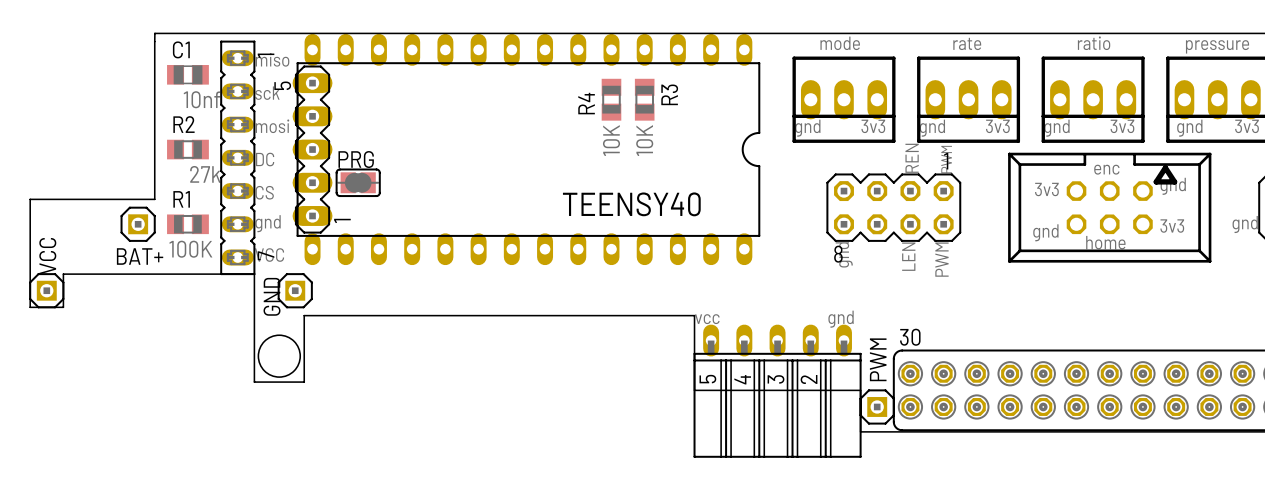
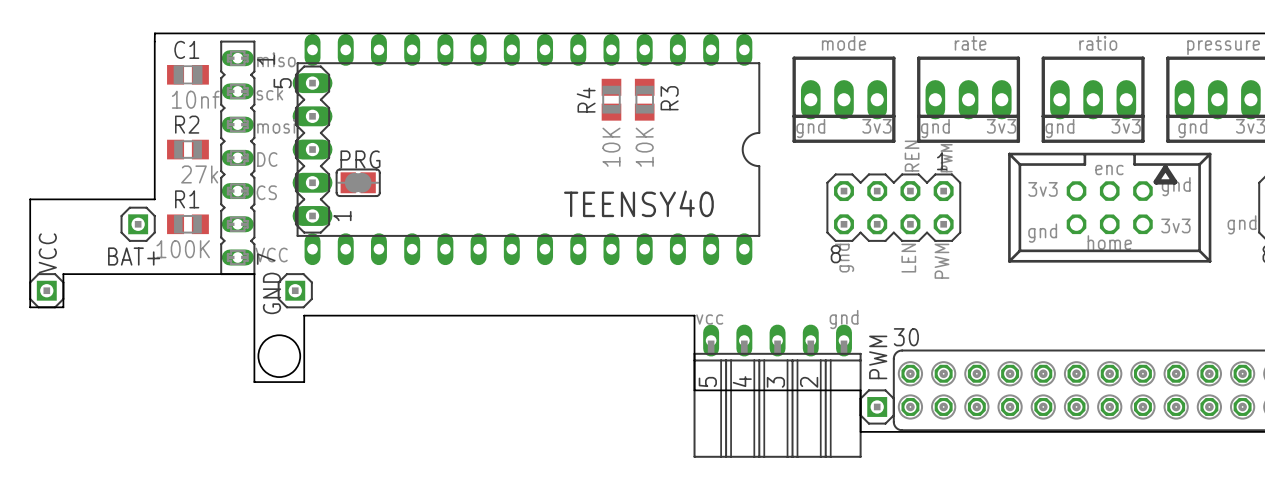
text: gnd (268, 223) -> none

